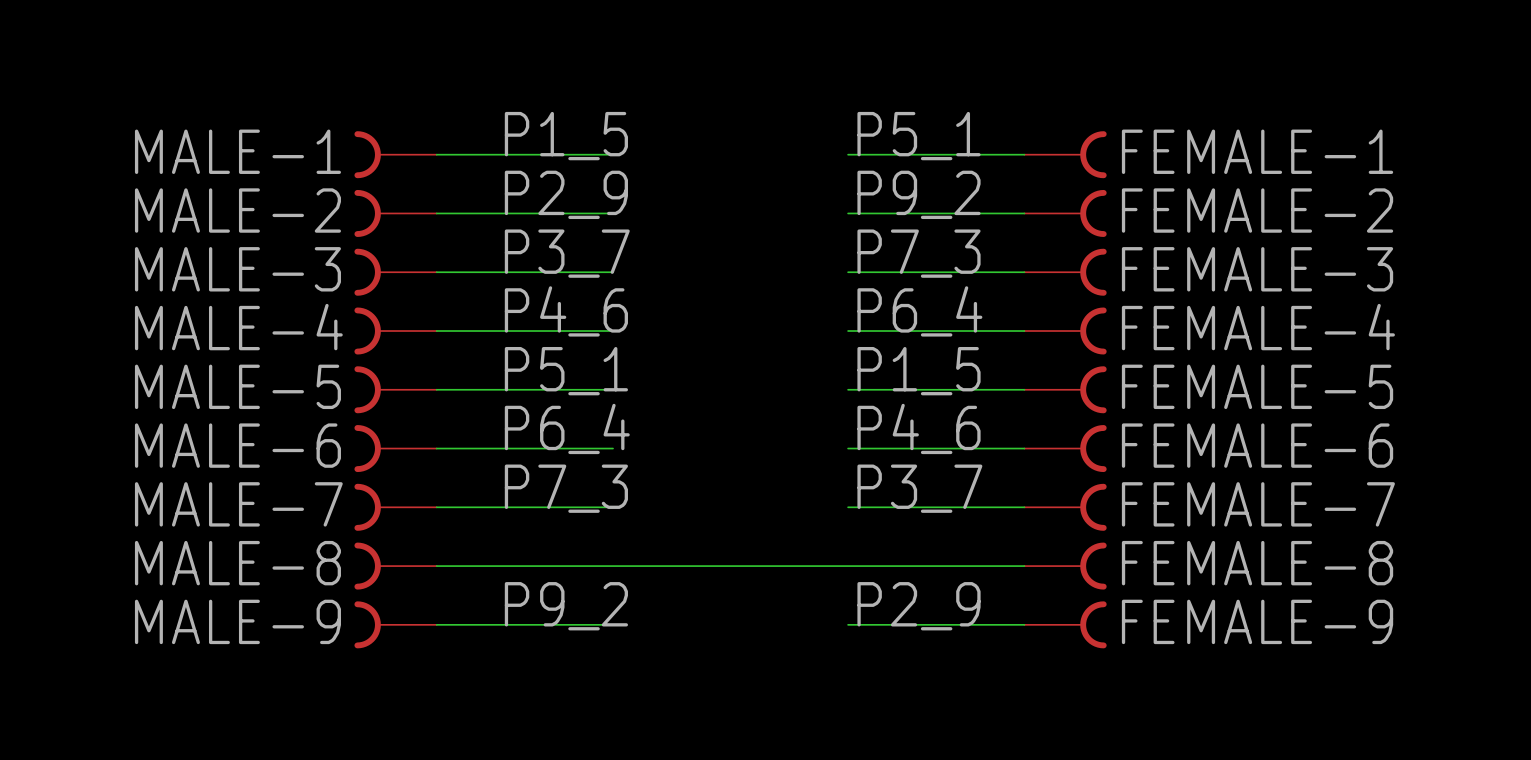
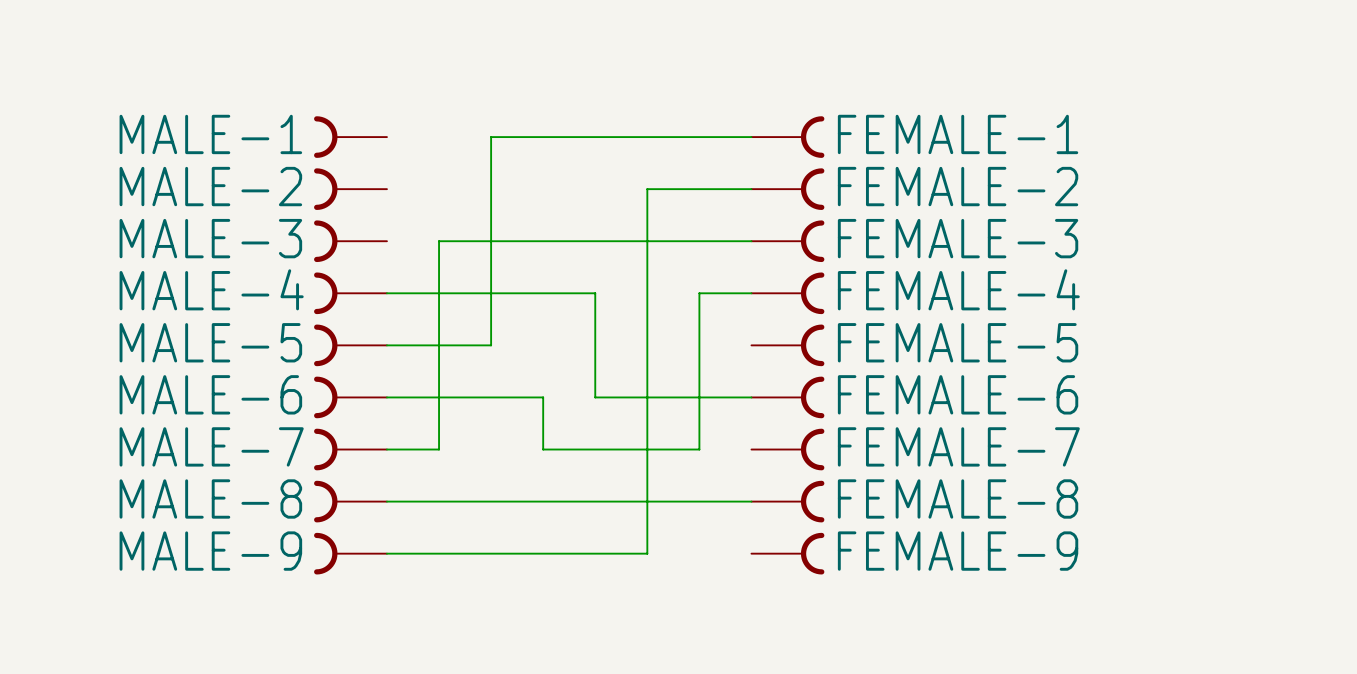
label: P1_5 (566, 136) -> none
label: P5_1 (919, 136) -> none
wire: (436, 154) (554, 154) -> none
wire: (848, 154) (1024, 154) -> (751, 137) (543, 137)
FEMALE-1 position: (1065, 154) -> (787, 137)
label: P2_9 (566, 194) -> none
label: P9_2 (919, 194) -> none
wire: (436, 213) (613, 213) -> none
wire: (848, 213) (1024, 213) -> (751, 189) (647, 189) (647, 553) (543, 553)
FEMALE-2 position: (1065, 213) -> (787, 189)
label: P3_7 (567, 253) -> none
label: P7_3 (919, 253) -> none
wire: (436, 272) (495, 272) -> (439, 449) (439, 241)
wire: (848, 272) (1024, 272) -> (751, 241) (543, 241)
FEMALE-3 position: (1065, 272) -> (787, 241)
label: P4_6 (566, 311) -> none
label: P6_4 (919, 311) -> none
wire: (848, 331) (1024, 331) -> (751, 293) (699, 293) (699, 449) (543, 449) (543, 397)
FEMALE-4 position: (1065, 331) -> (787, 293)
label: P5_1 (566, 371) -> none
label: P1_5 (919, 371) -> none
wire: (554, 389) (613, 389) -> (491, 345) (491, 137)
wire: (848, 389) (1024, 389) -> none
FEMALE-5 position: (1065, 389) -> (787, 345)
label: P6_4 (567, 428) -> none
label: P4_6 (919, 428) -> none
wire: (848, 448) (1024, 448) -> (751, 397) (595, 397) (595, 293) (543, 293)
FEMALE-6 position: (1065, 448) -> (787, 397)
label: P7_3 (566, 488) -> none
label: P3_7 (919, 488) -> none
wire: (495, 507) (613, 507) -> none
wire: (848, 507) (1024, 507) -> none
FEMALE-7 position: (1065, 507) -> (787, 449)
wire: (848, 566) (1024, 566) -> none
FEMALE-8 position: (1065, 566) -> (787, 501)
label: P9_2 (566, 606) -> none
label: P2_9 (919, 606) -> none
wire: (848, 624) (1024, 624) -> none
FEMALE-9 position: (1065, 624) -> (787, 553)

